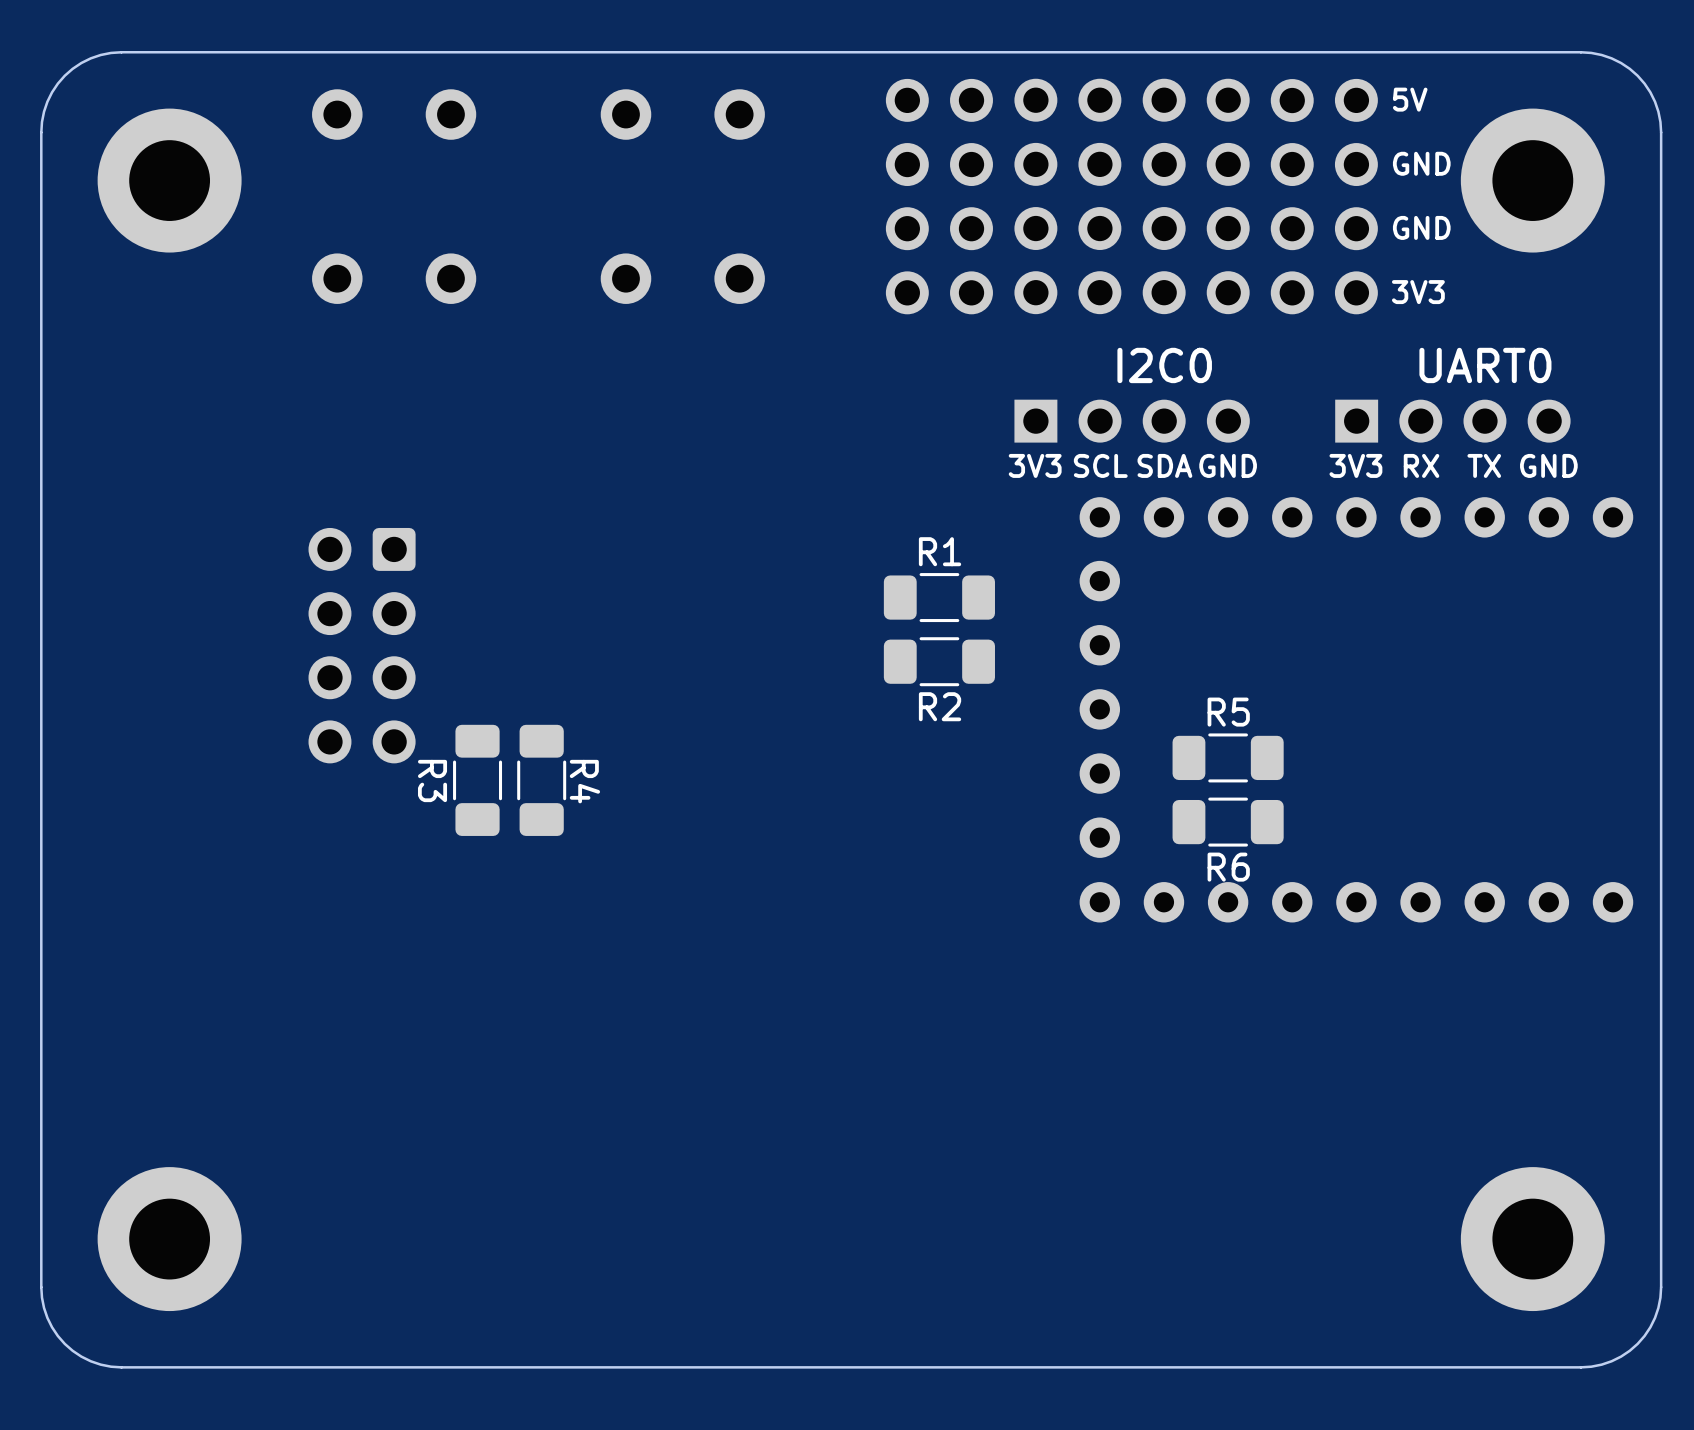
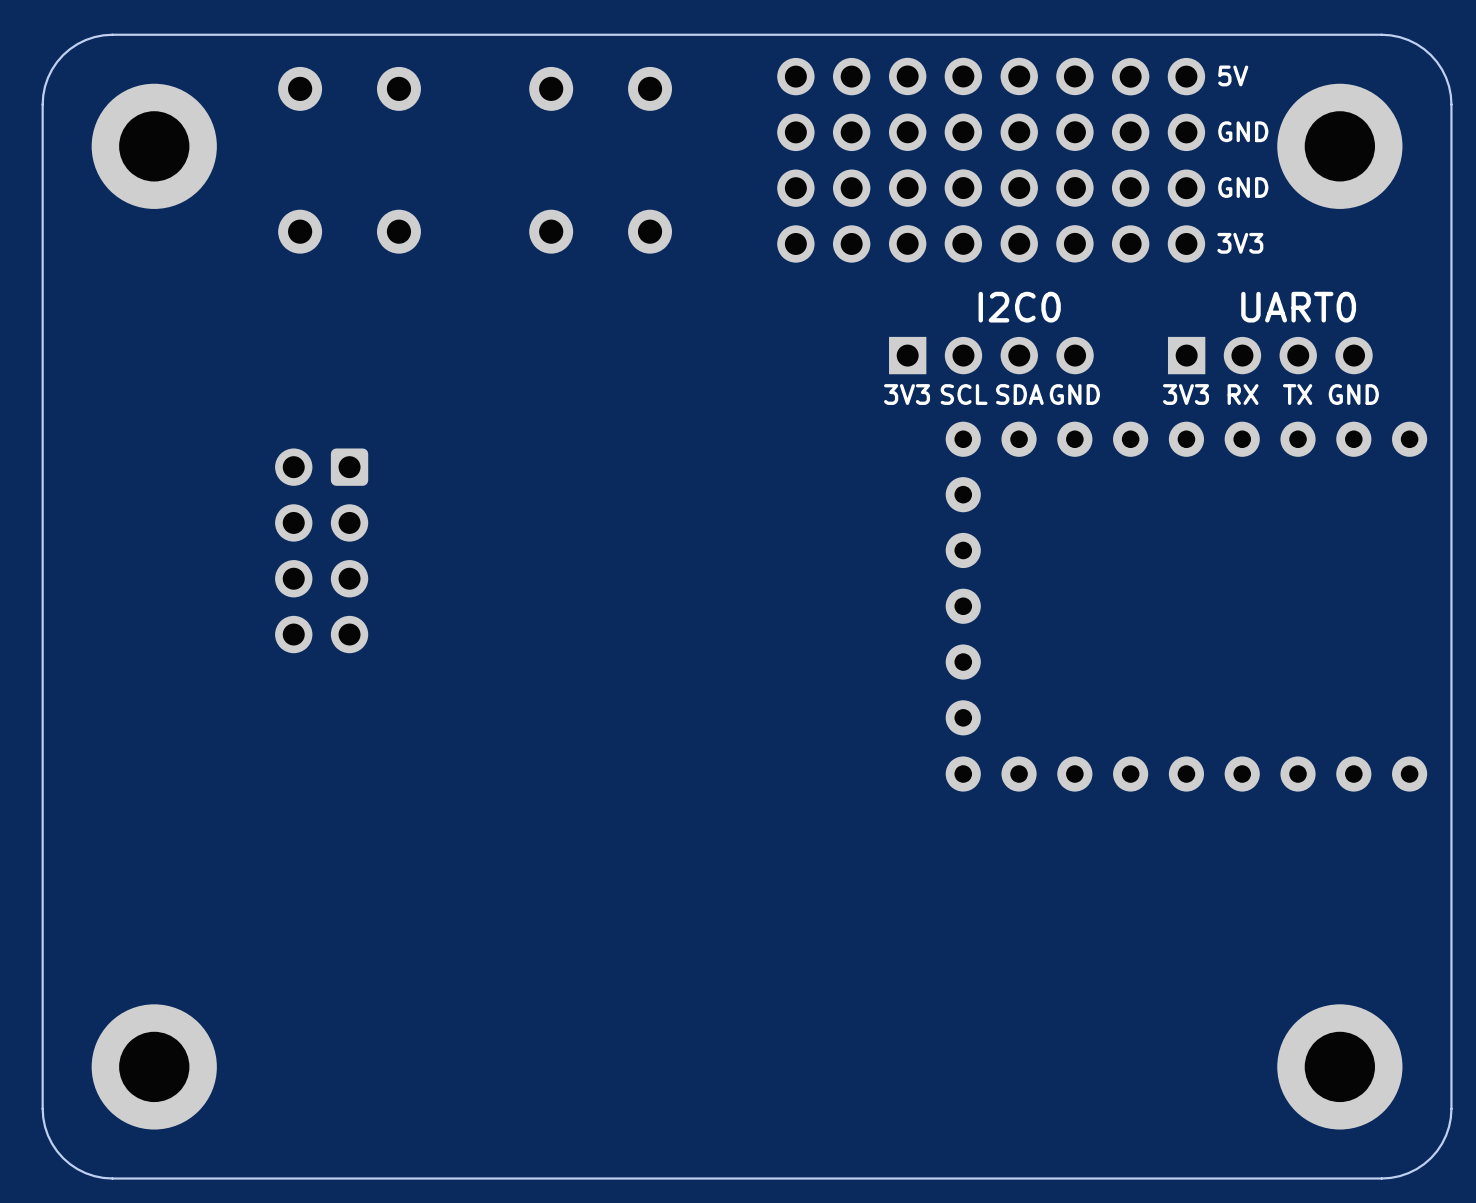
R1: (939, 597) -> none
R2: (939, 661) -> none
R5: (1228, 757) -> none
R3: (477, 780) -> none
R4: (541, 780) -> none
R6: (1228, 822) -> none

